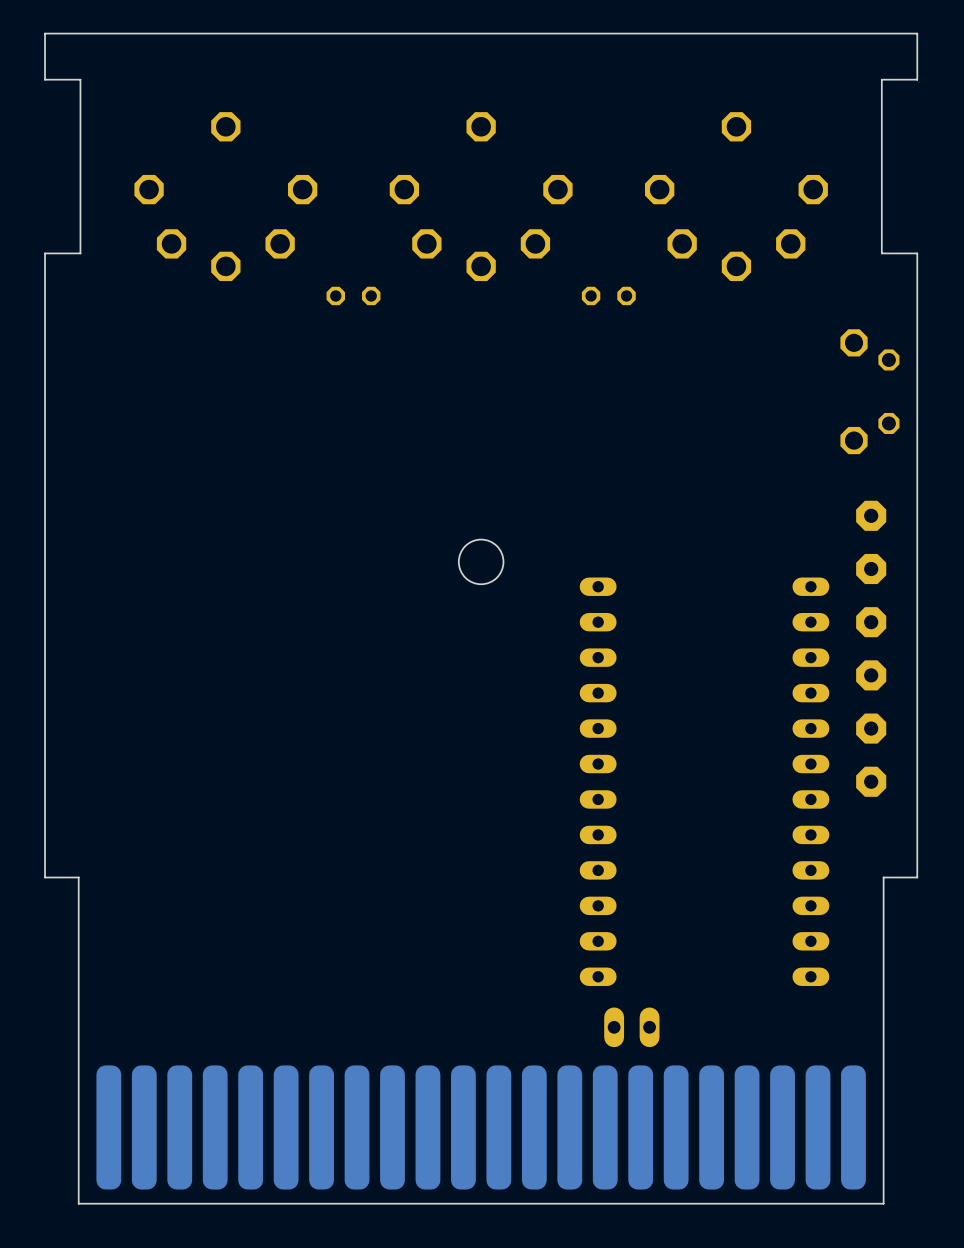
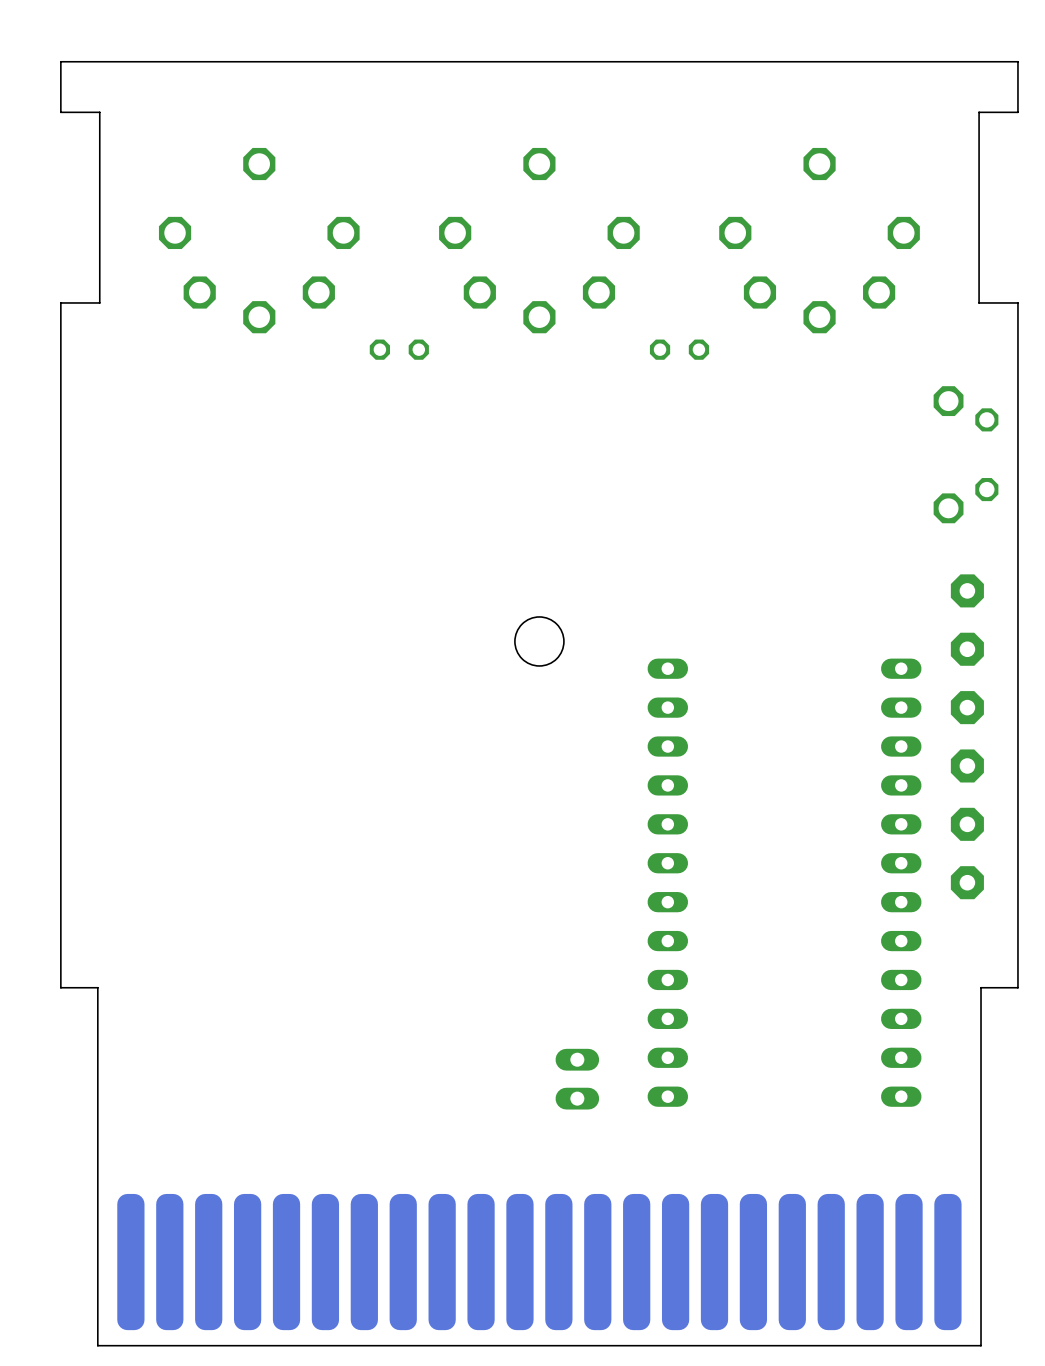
part rotation: 0° (631, 1027) -> 90° clockwise (577, 1079)
part position: (631, 1027) -> (577, 1079)

